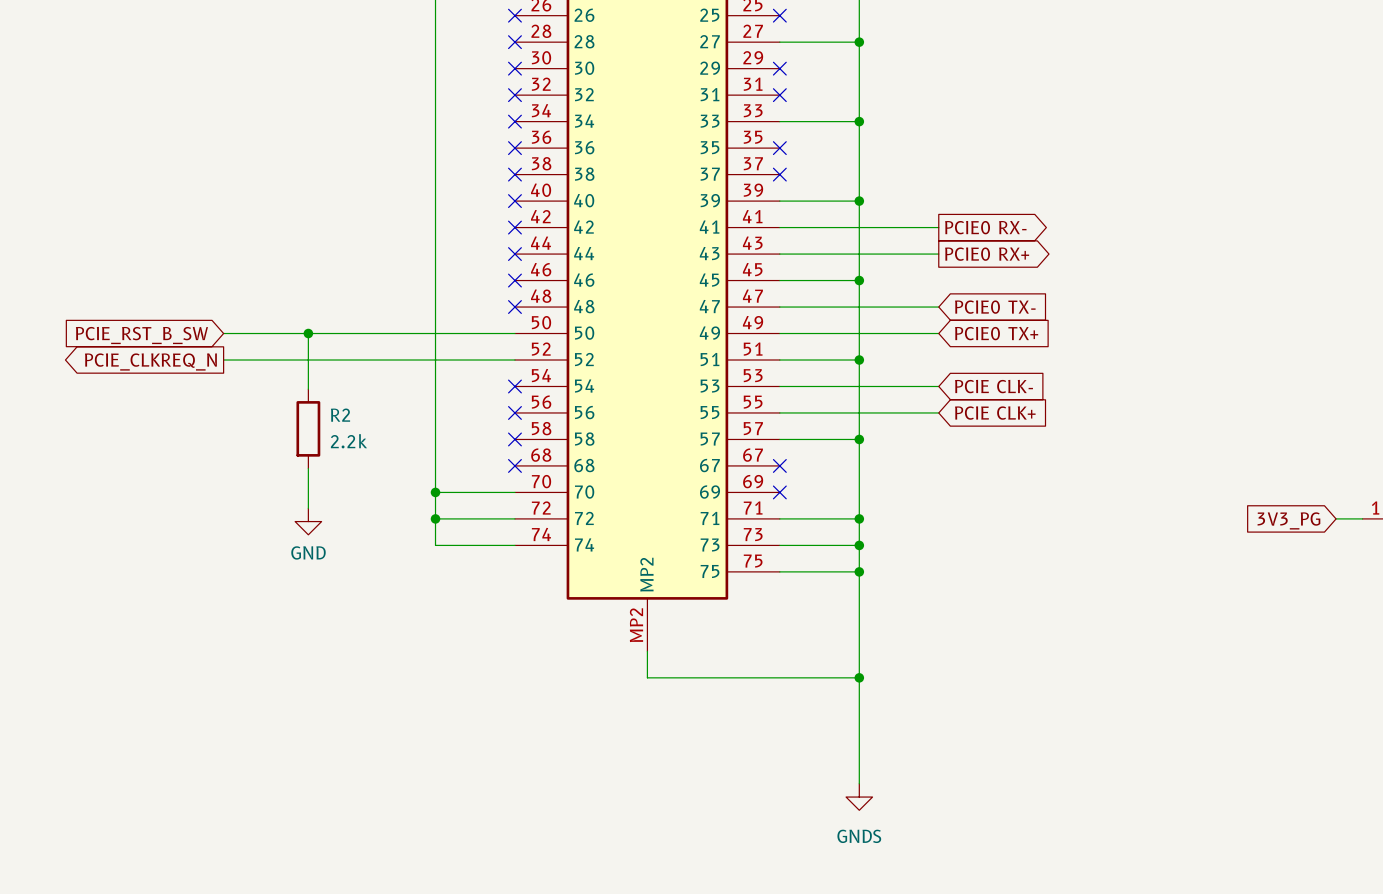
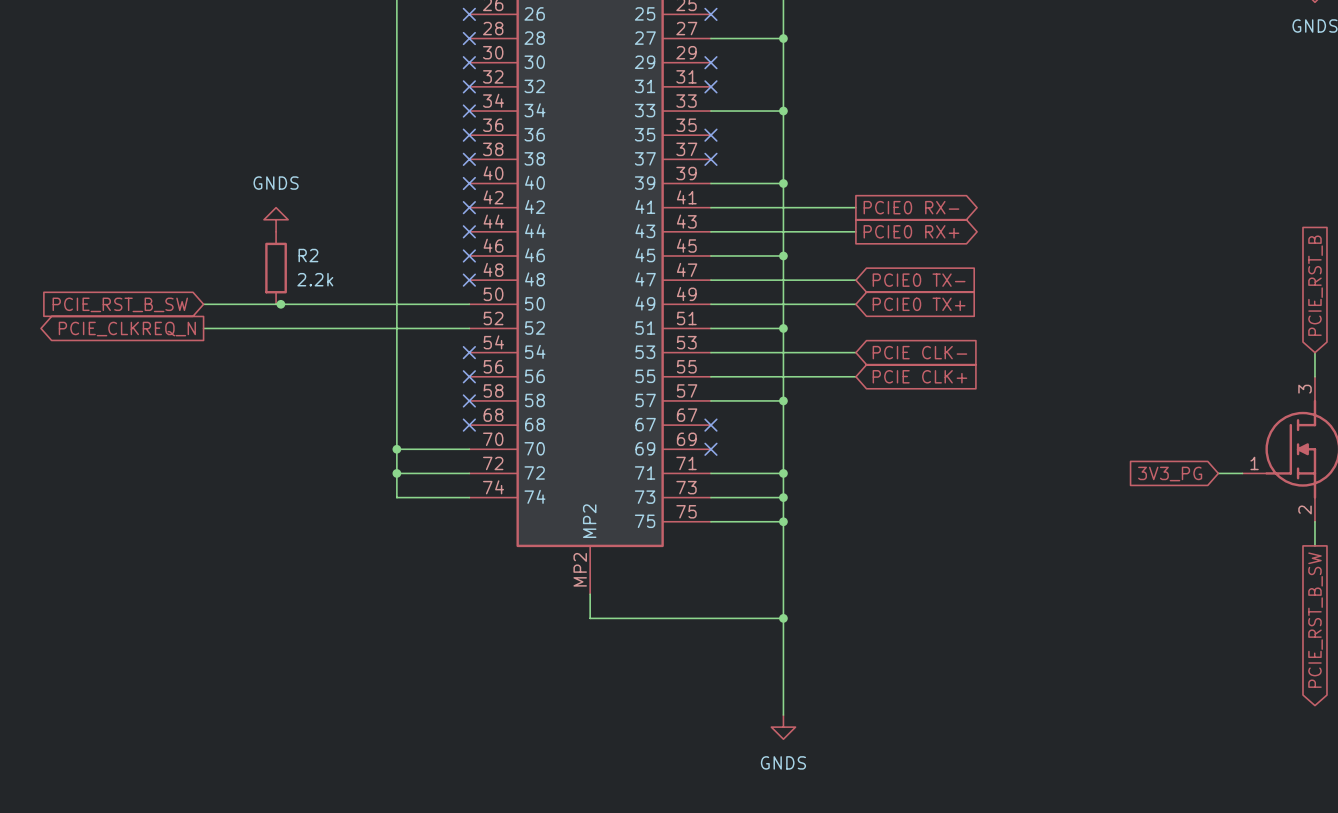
power symbol: none -> GNDS (276, 219)
wire: (308, 333) (308, 389) -> none
R2 position: (308, 428) -> (276, 268)
wire: (308, 468) (308, 508) -> none
power symbol: GND (308, 521) -> none

